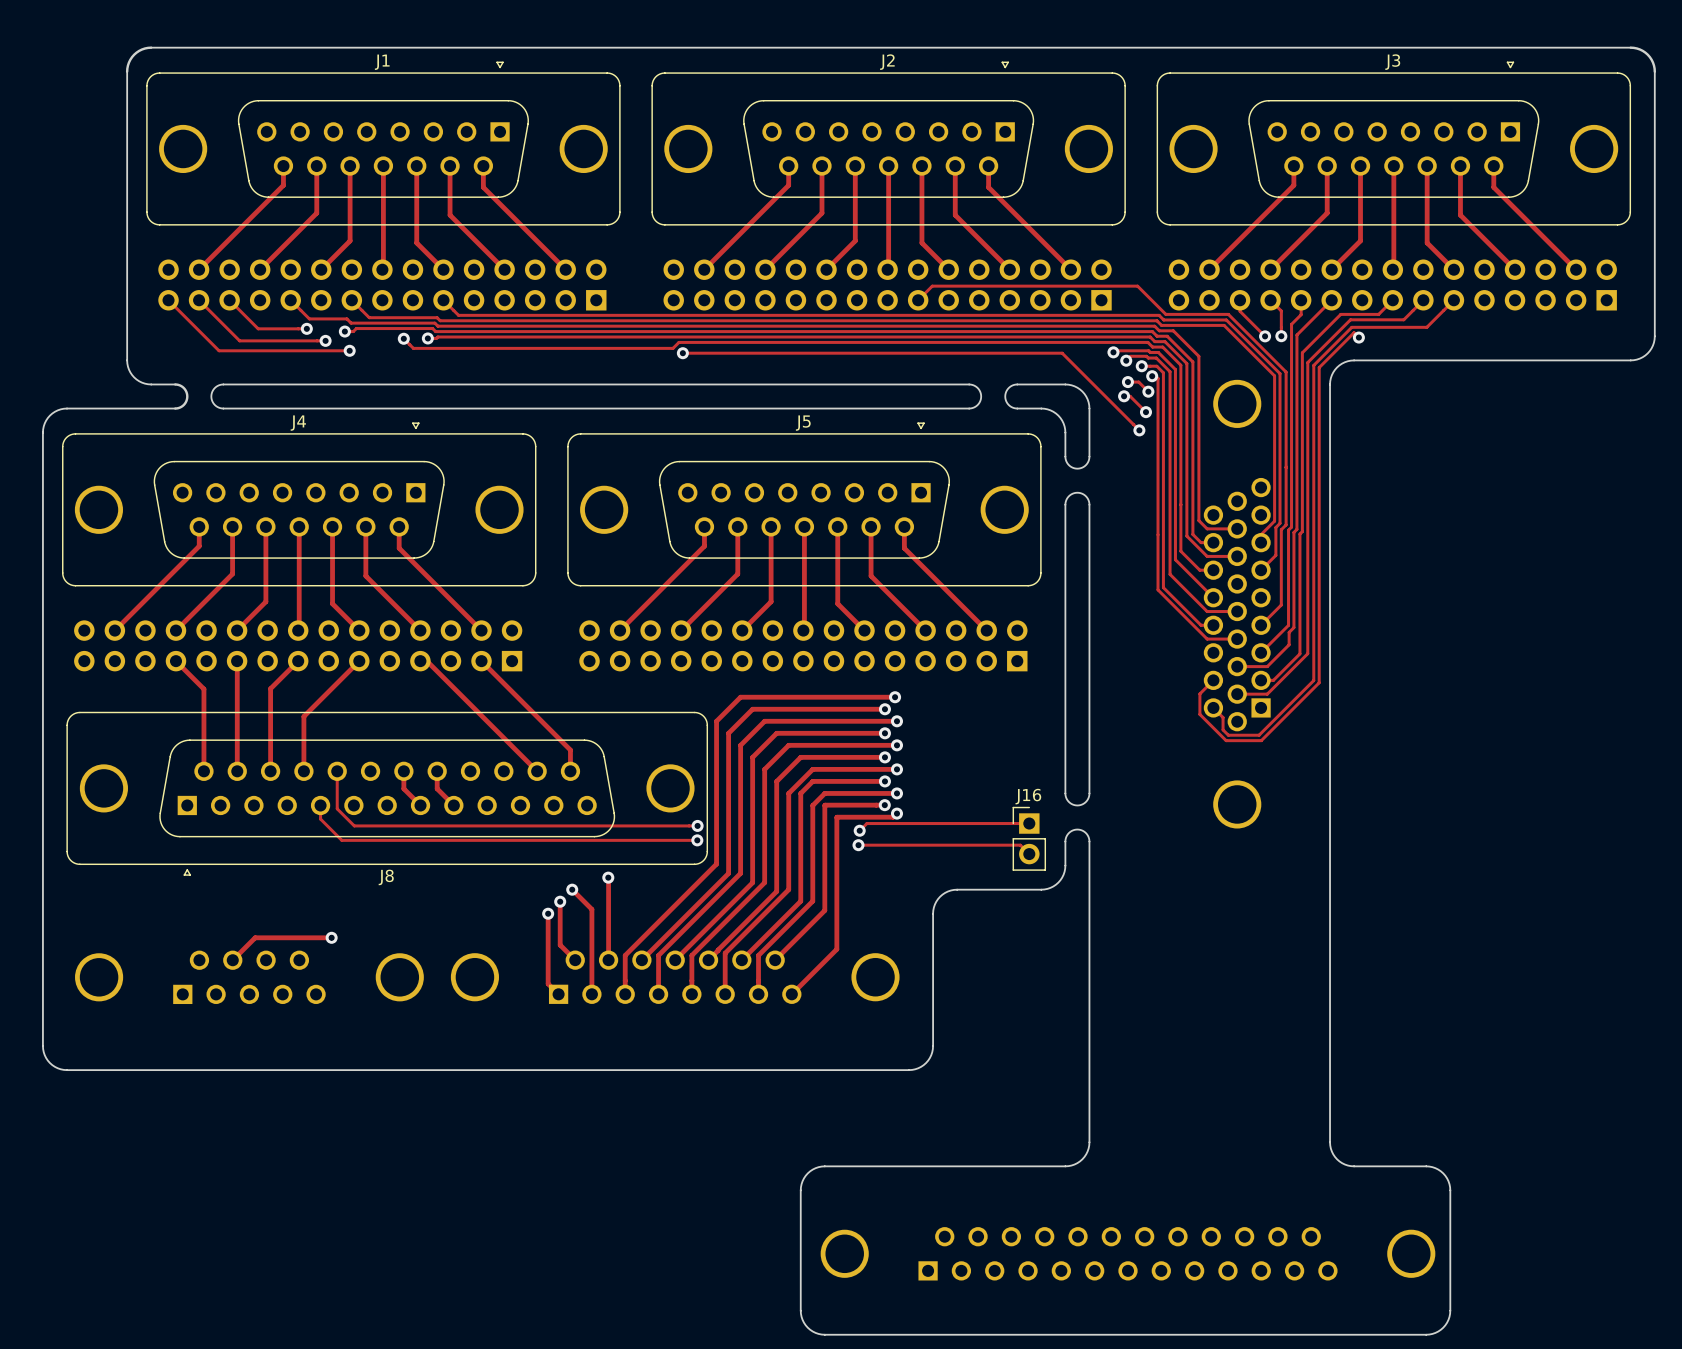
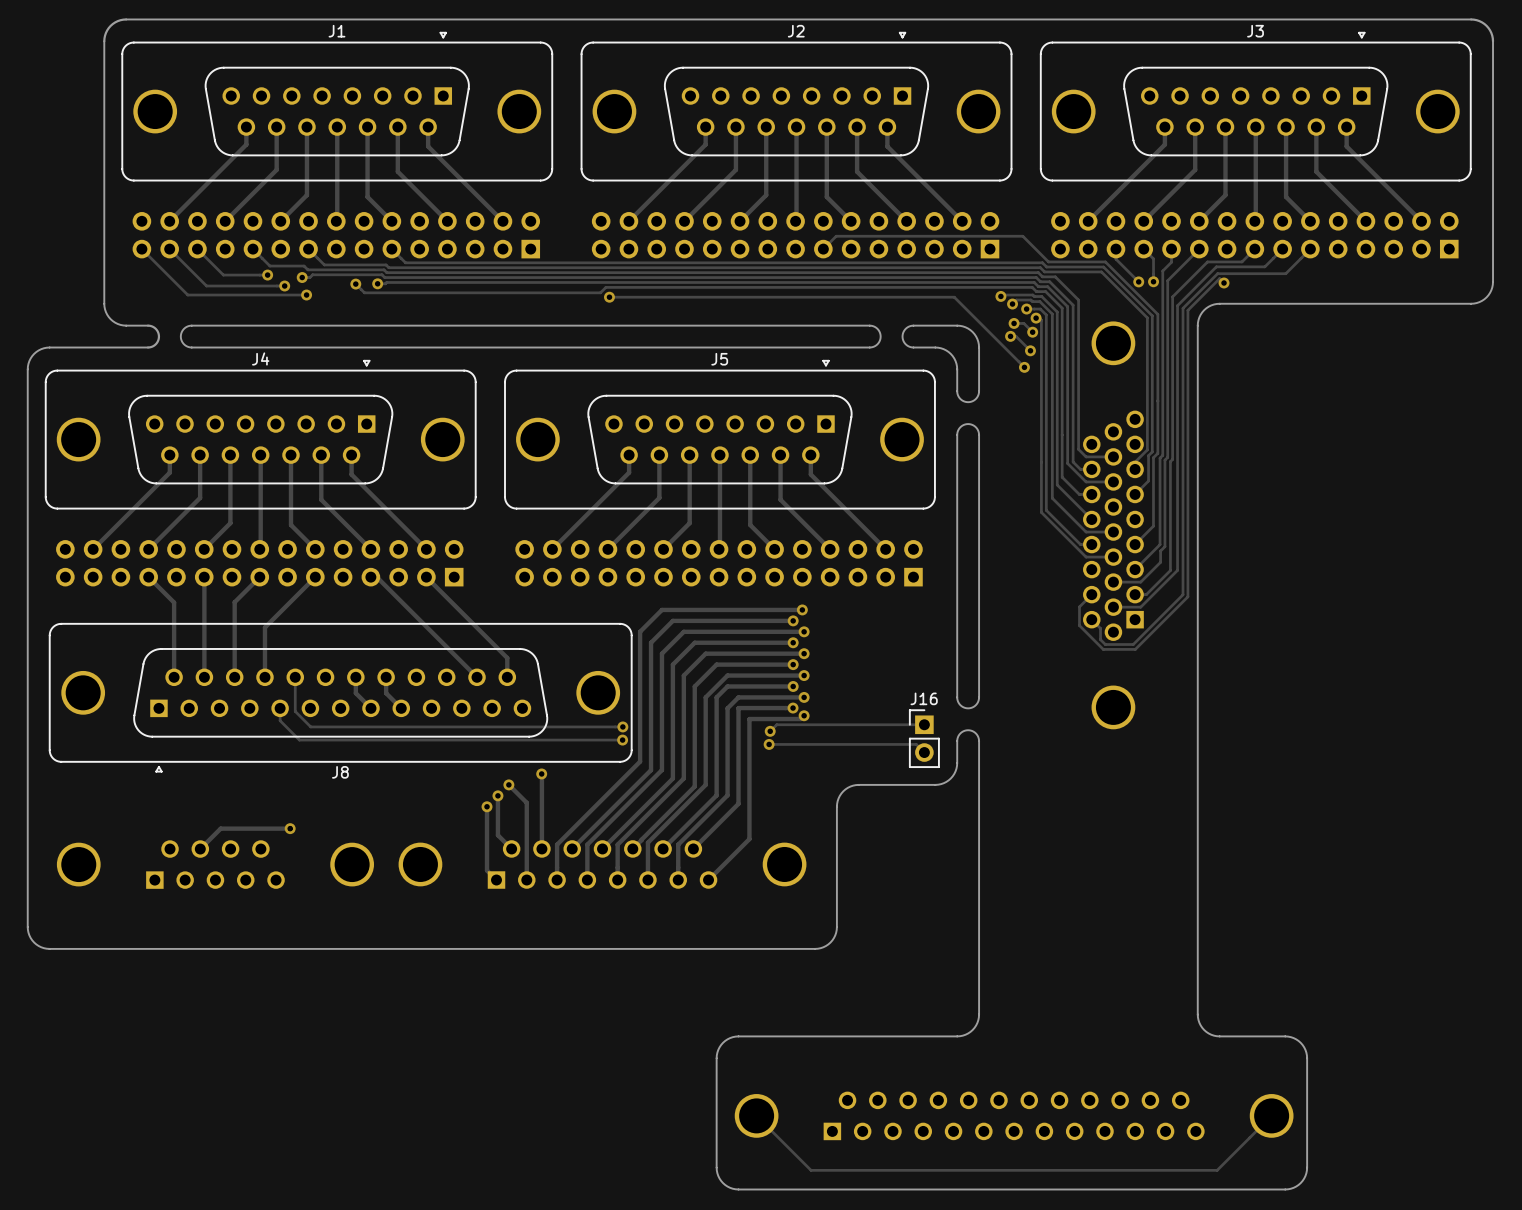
track: none -> (756, 1115) (811, 1170) (1217, 1170) (1271, 1115)

